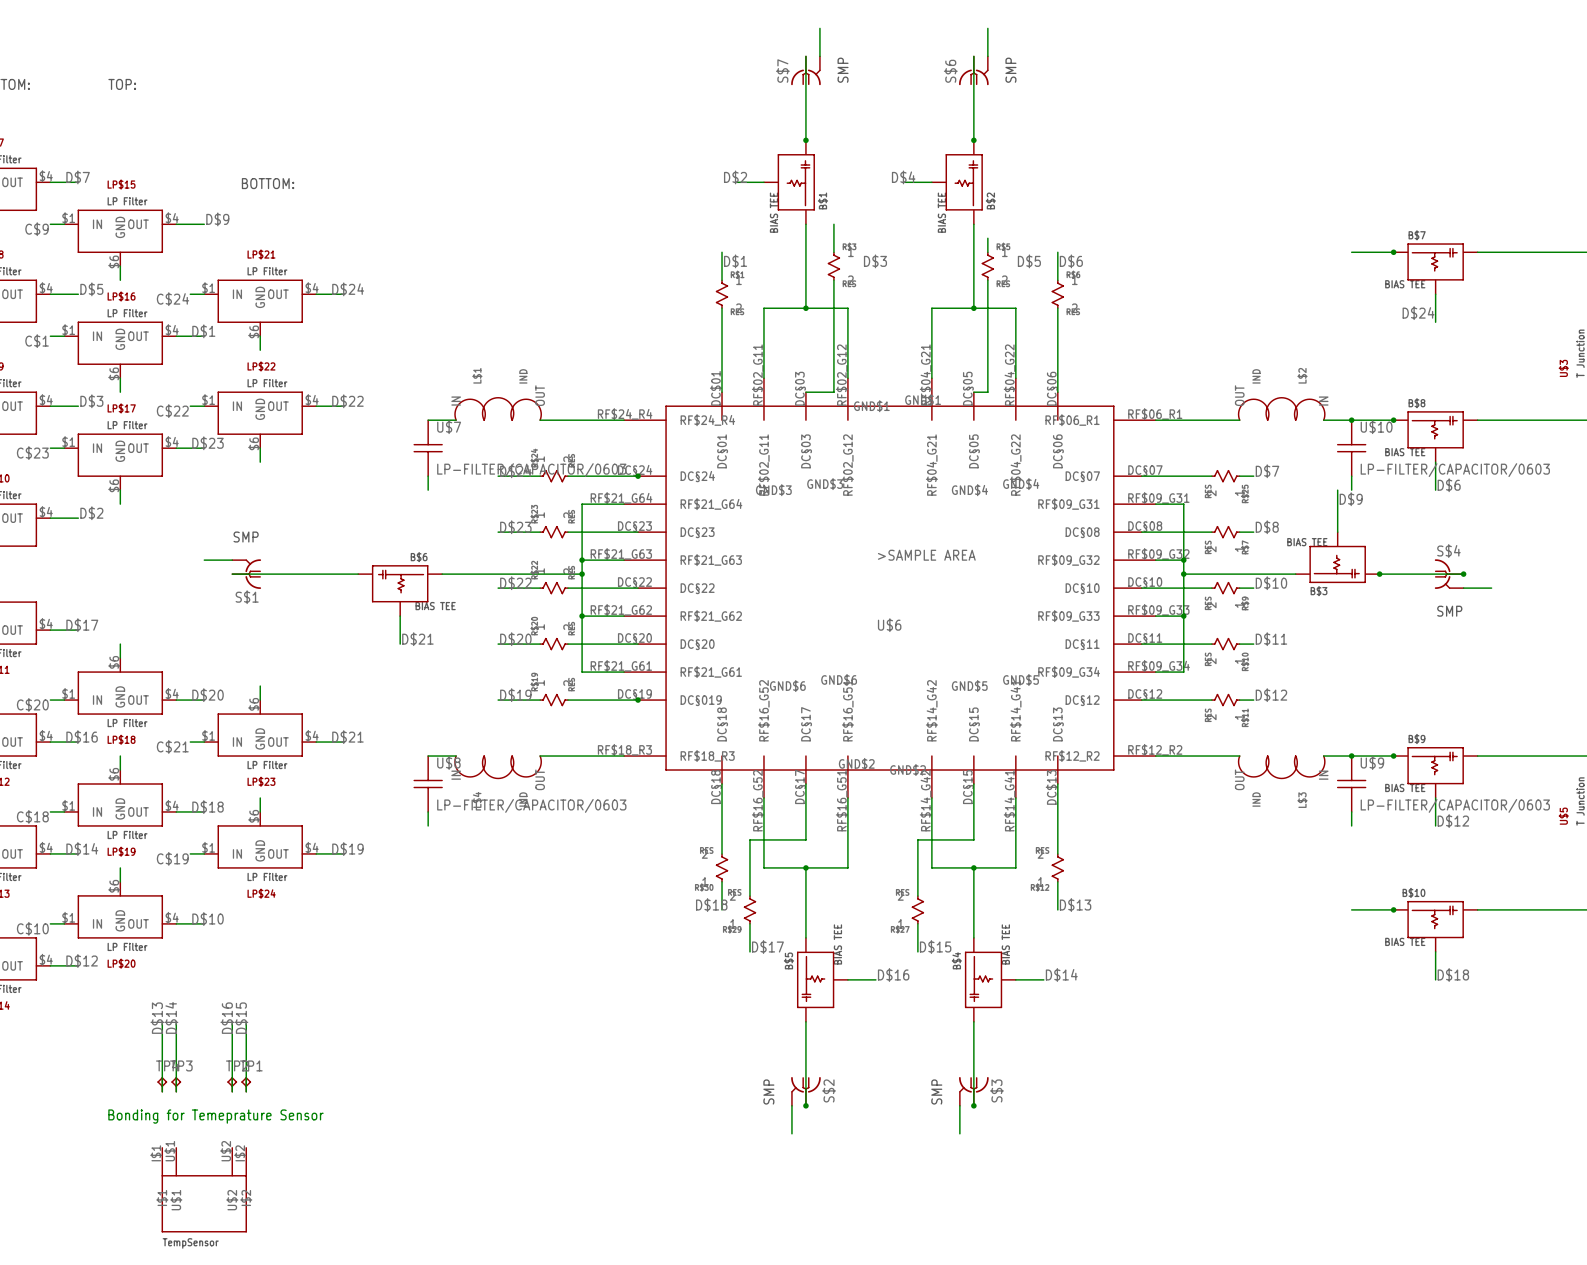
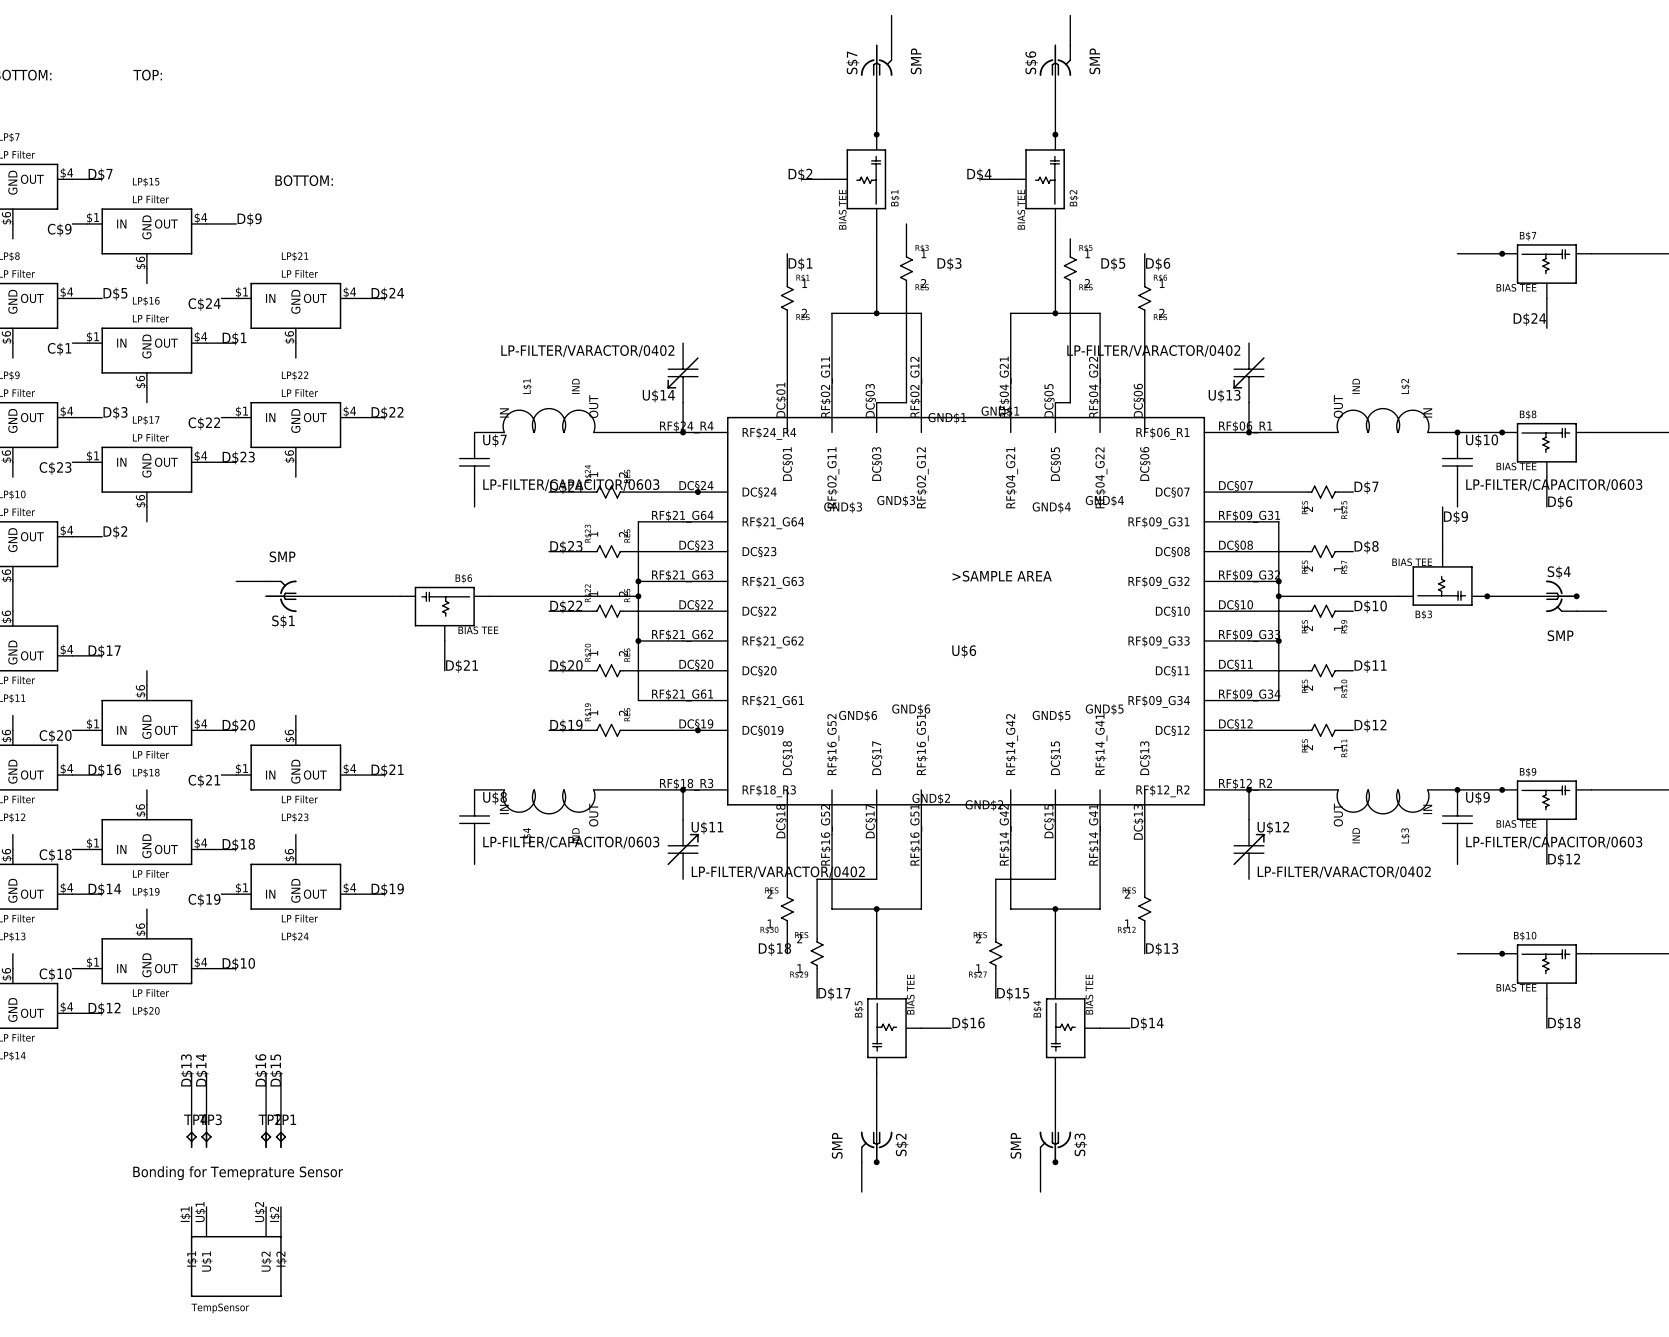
U$14: none -> LP-FILTER/VARACTOR/0402 (683, 372)
U$13: none -> LP-FILTER/VARACTOR/0402 (1249, 372)
wire: none -> (683, 402) (683, 432)
wire: none -> (1249, 402) (1249, 432)
junction: none -> (683, 432)
junction: none -> (1249, 432)
wire: none -> (683, 789) (683, 819)
junction: none -> (683, 789)
wire: none -> (1249, 789) (1249, 819)
junction: none -> (1249, 789)
U$11: none -> LP-FILTER/VARACTOR/0402 (683, 849)
U$12: none -> LP-FILTER/VARACTOR/0402 (1249, 849)

